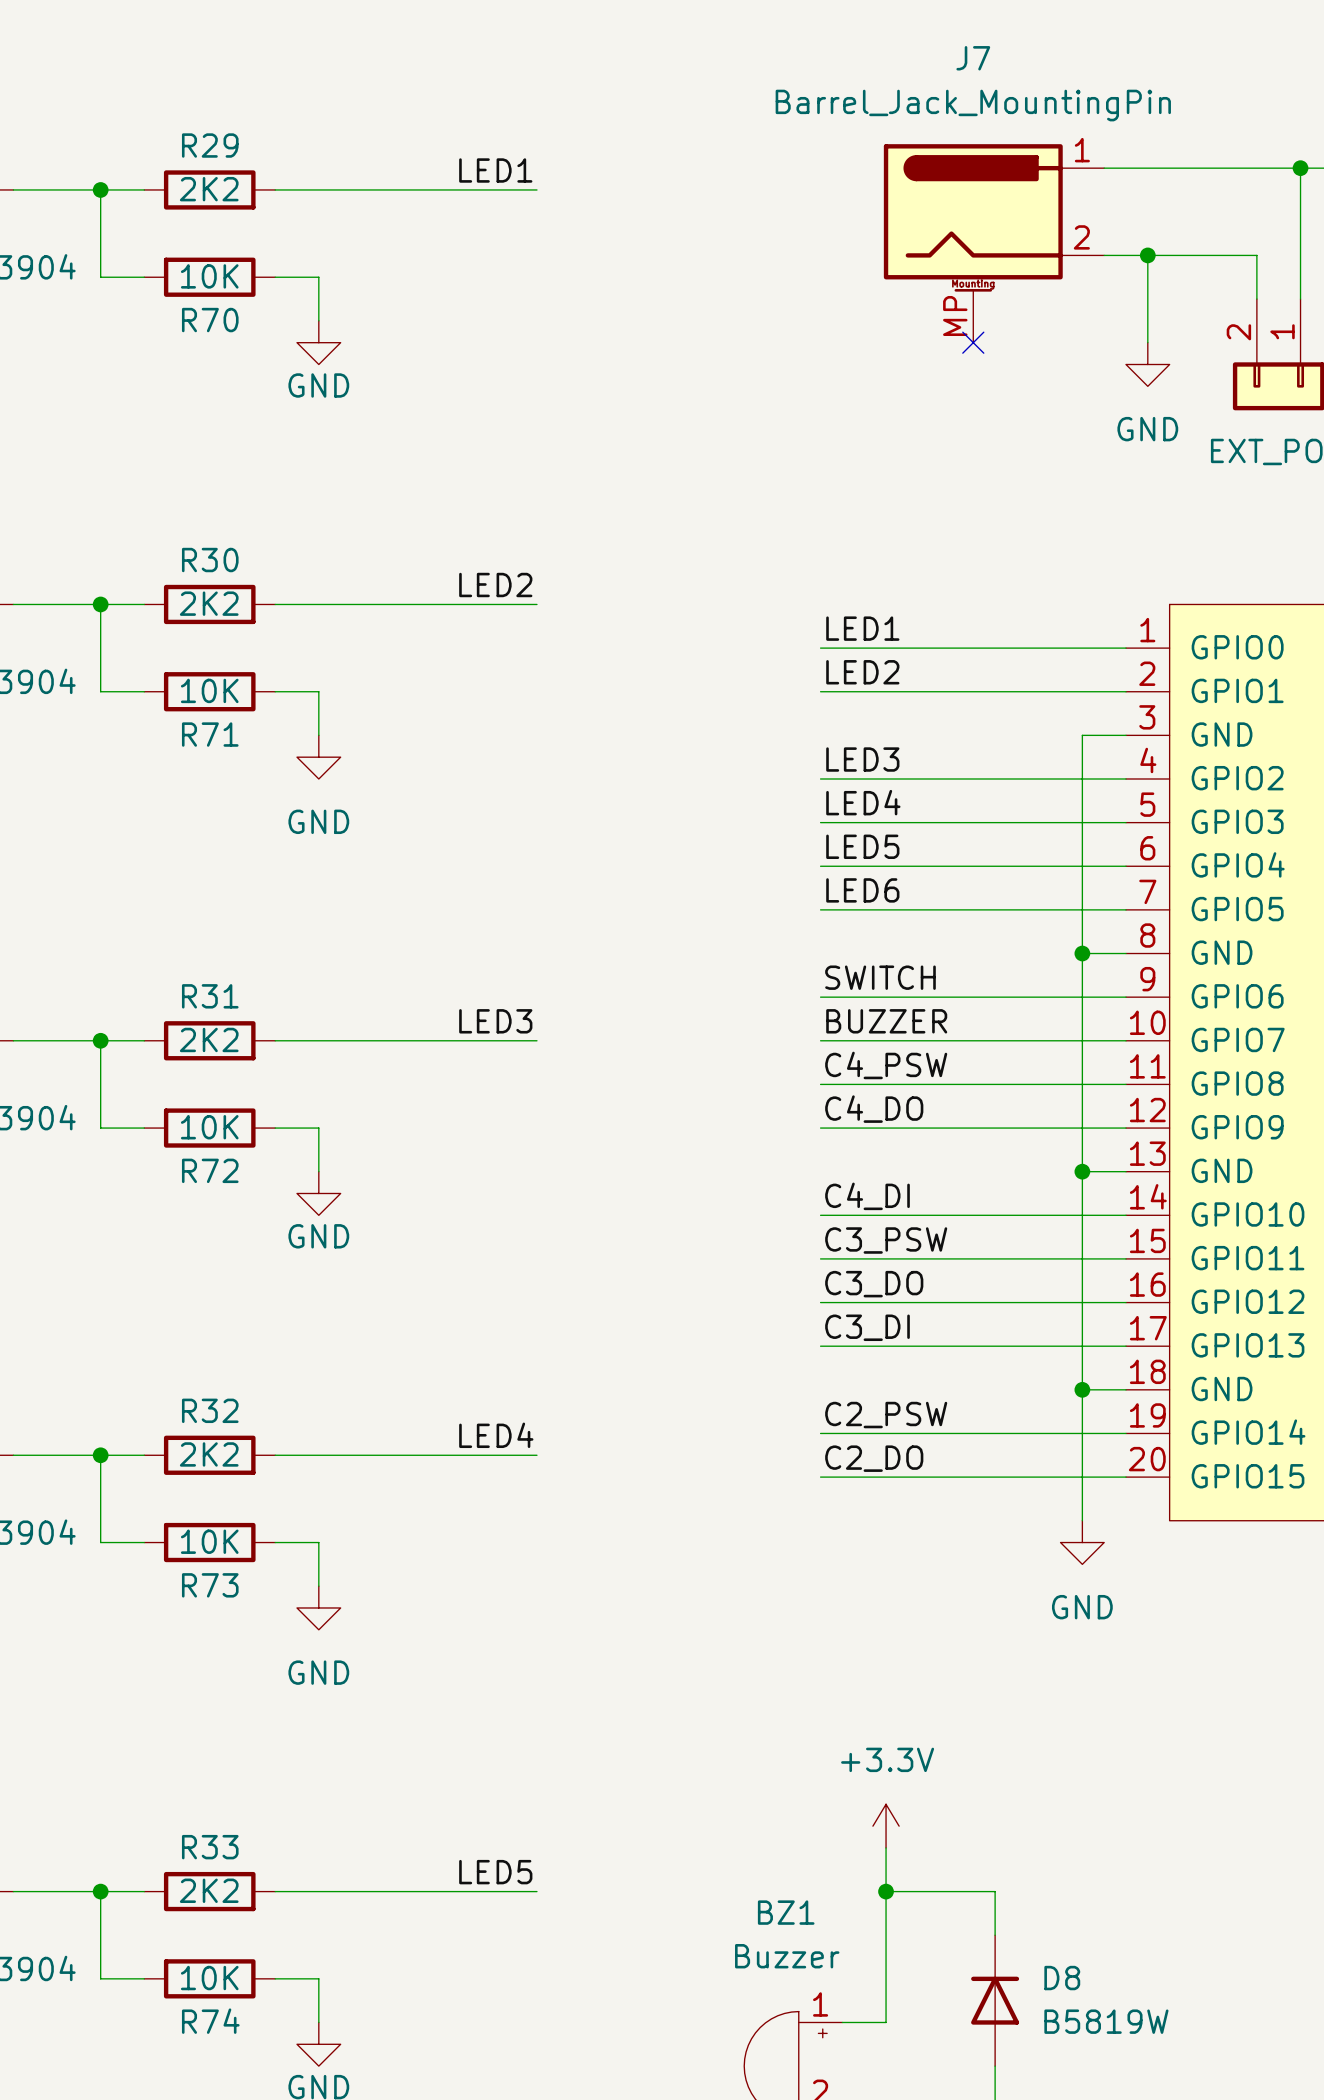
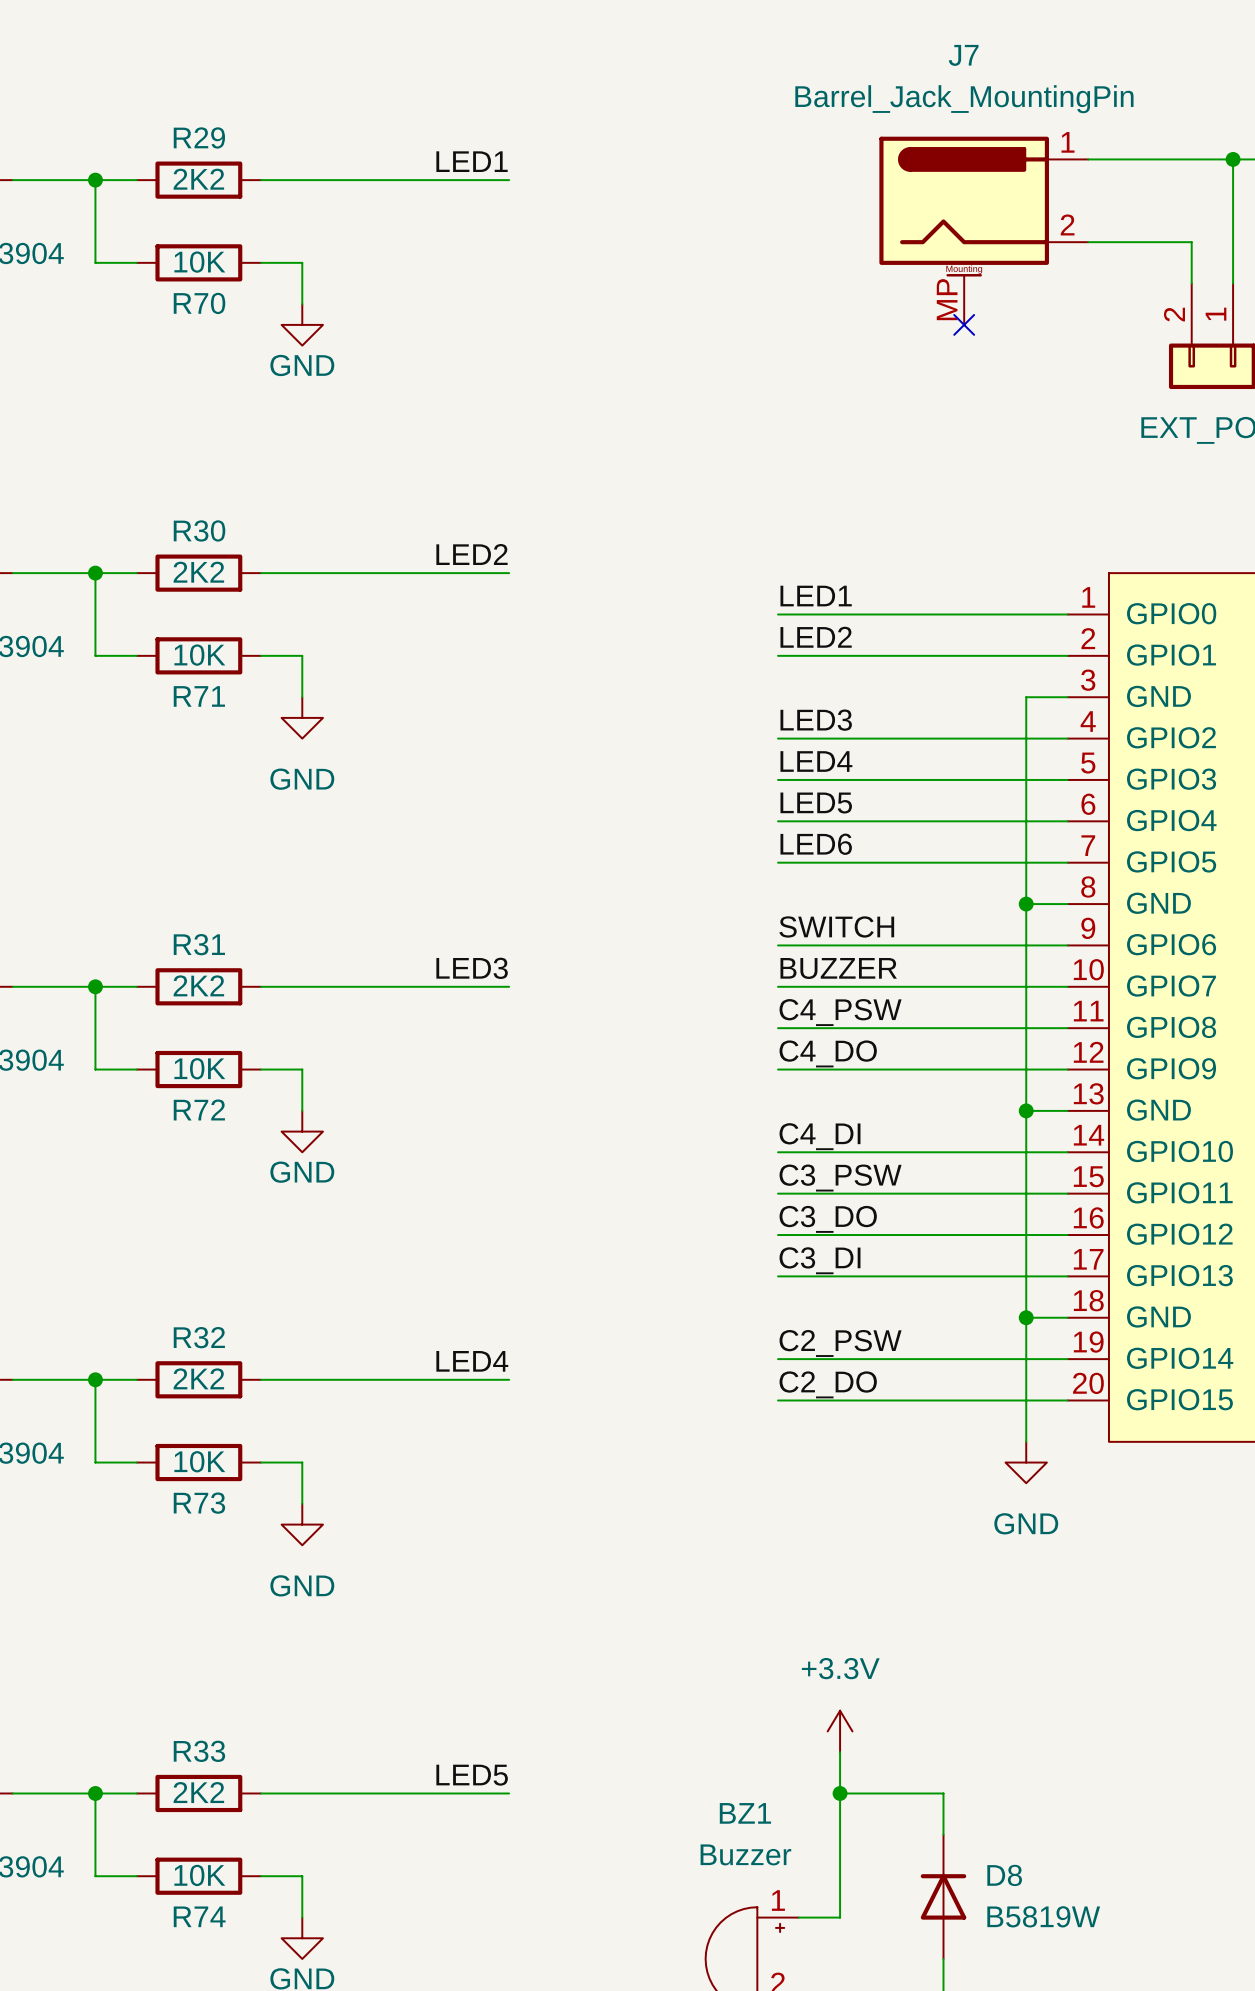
J7 position: (994, 243) -> (983, 230)
wire: (1104, 255) (1147, 255) (1147, 342) -> none
junction: (1147, 255) -> none
no-connect mark position: (973, 342) -> (964, 324)
power symbol: GND (1147, 364) -> none

